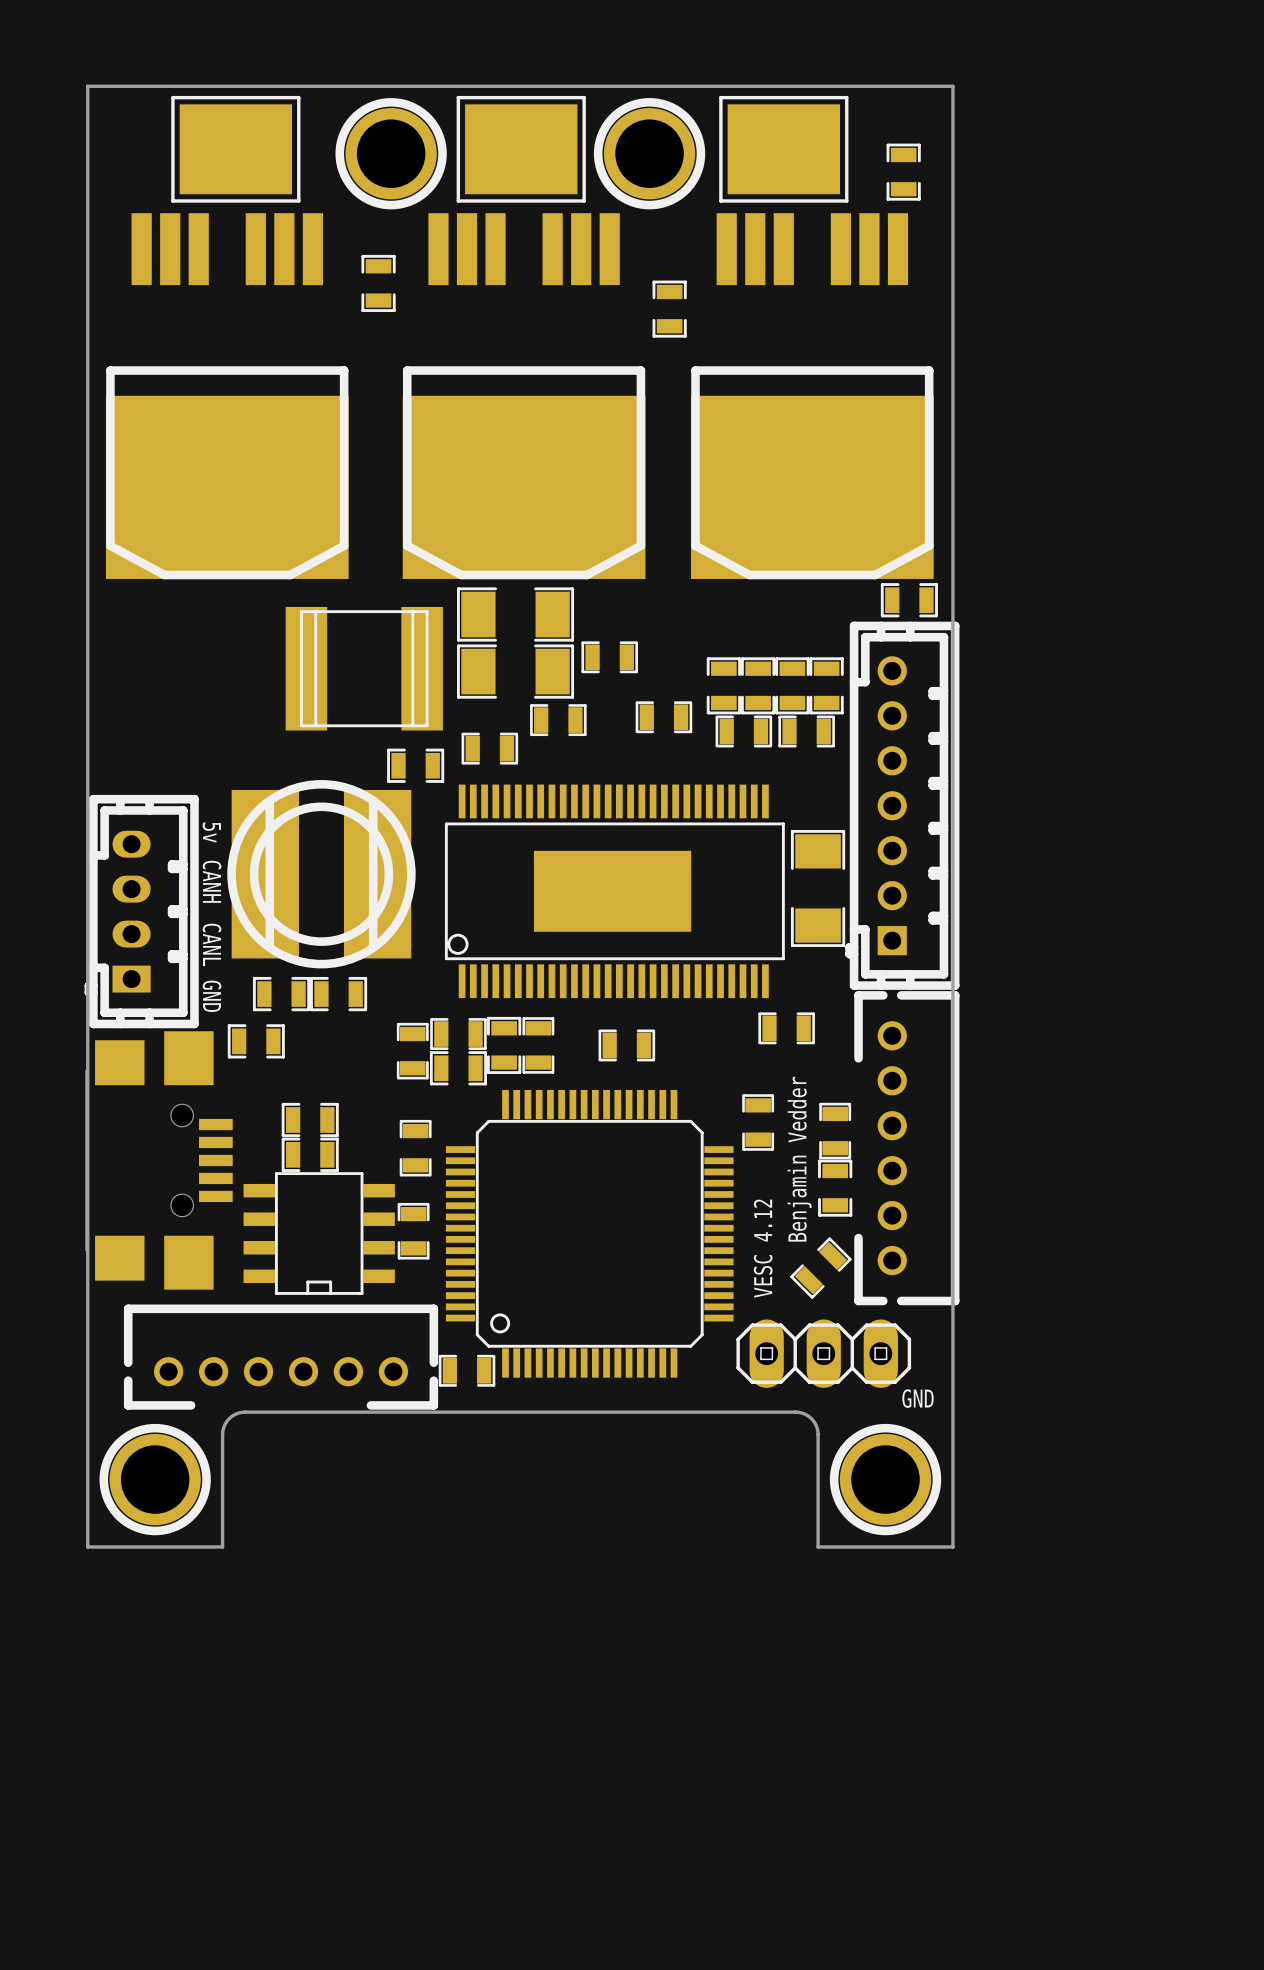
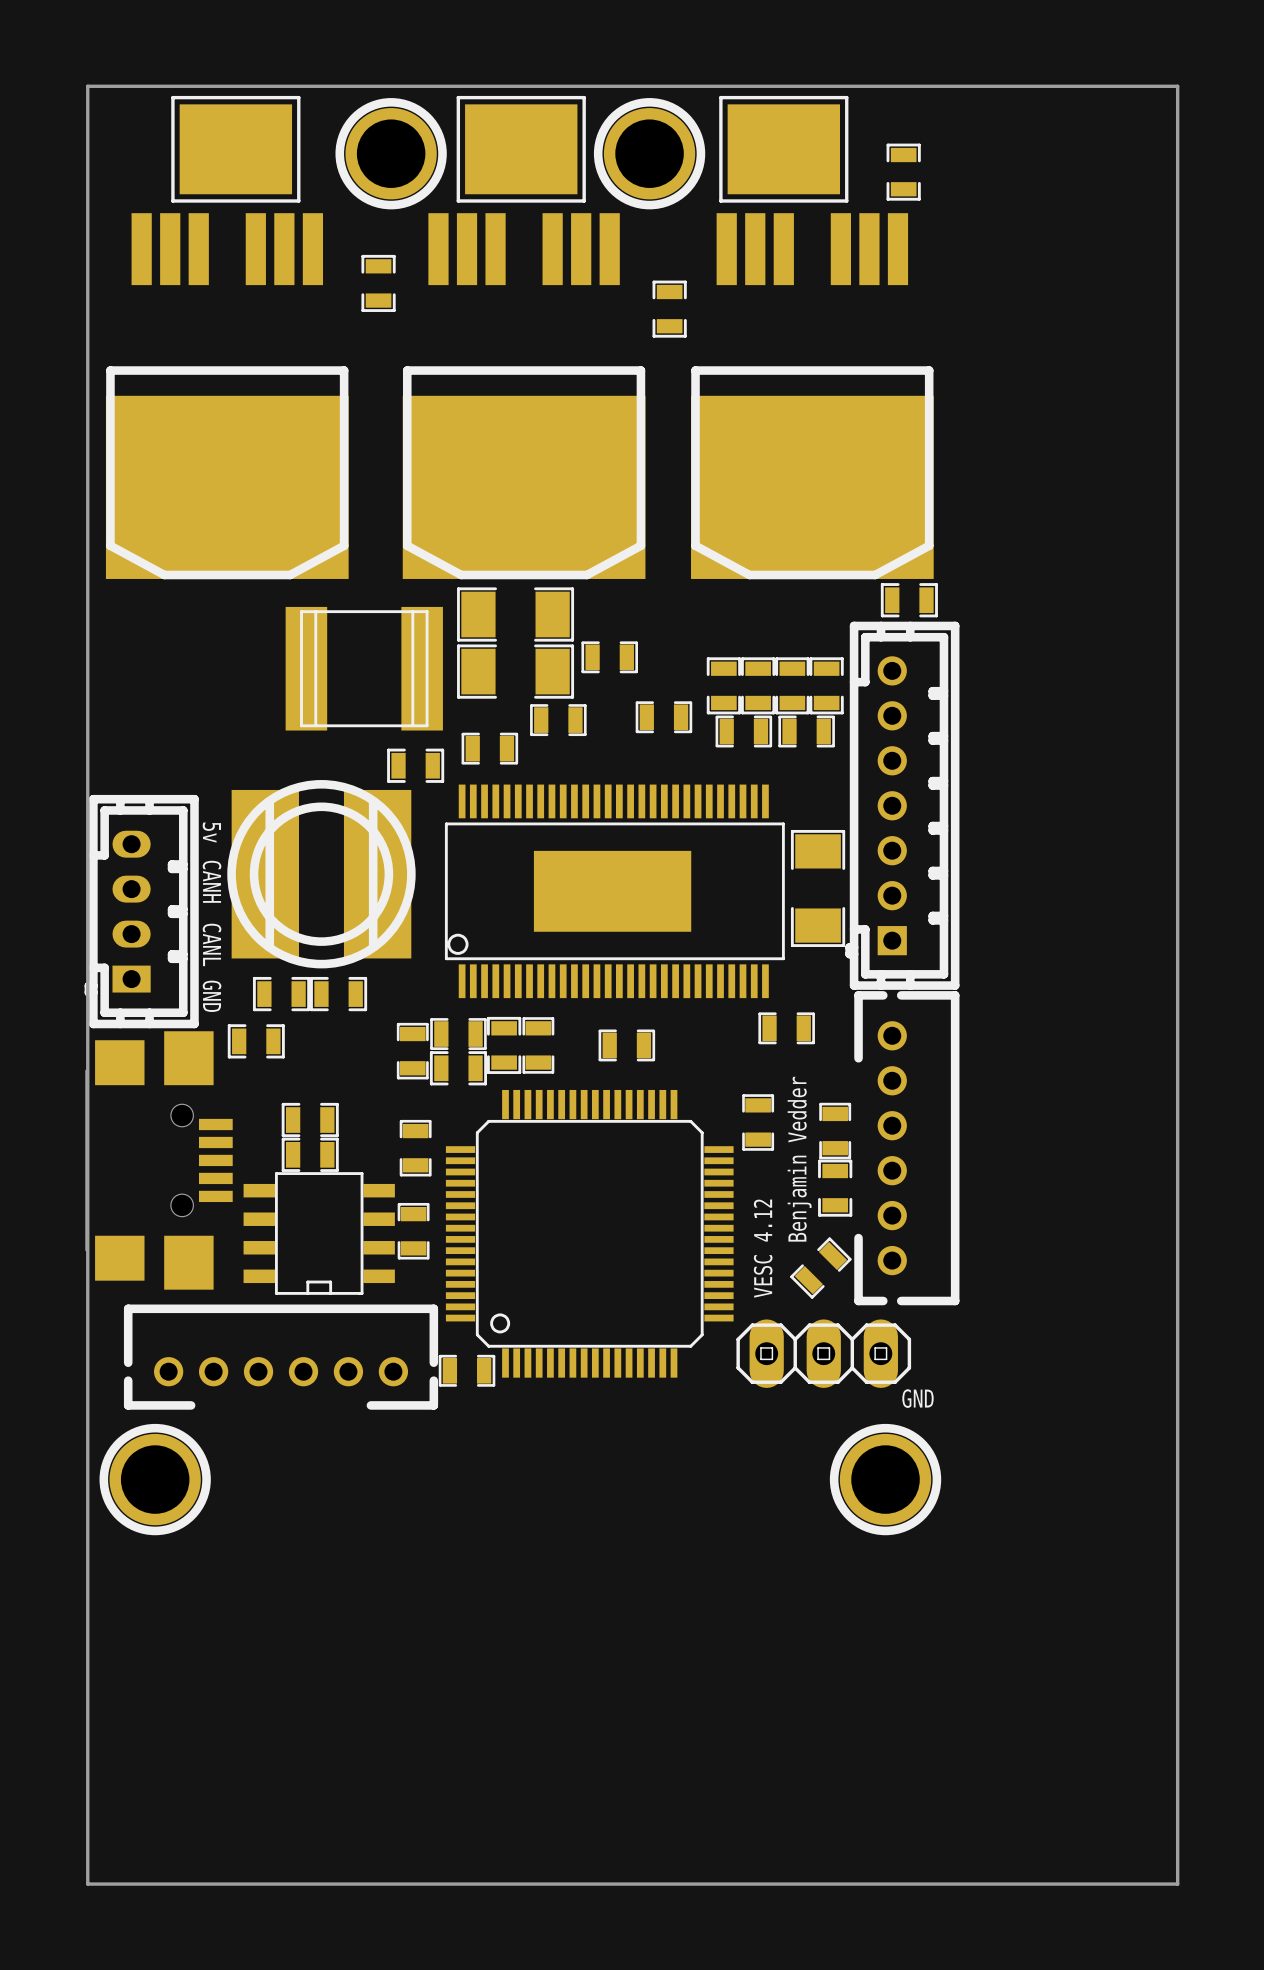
board edge: (952, 86) (952, 1546) (818, 1546) (817, 1432) (811, 1418) (805, 1414) (795, 1412) (240, 1412) (227, 1420) (222, 1432) (222, 1546) (87, 1546) -> (952, 86) (1177, 86) (1177, 1884) (87, 1884) (87, 1546)

